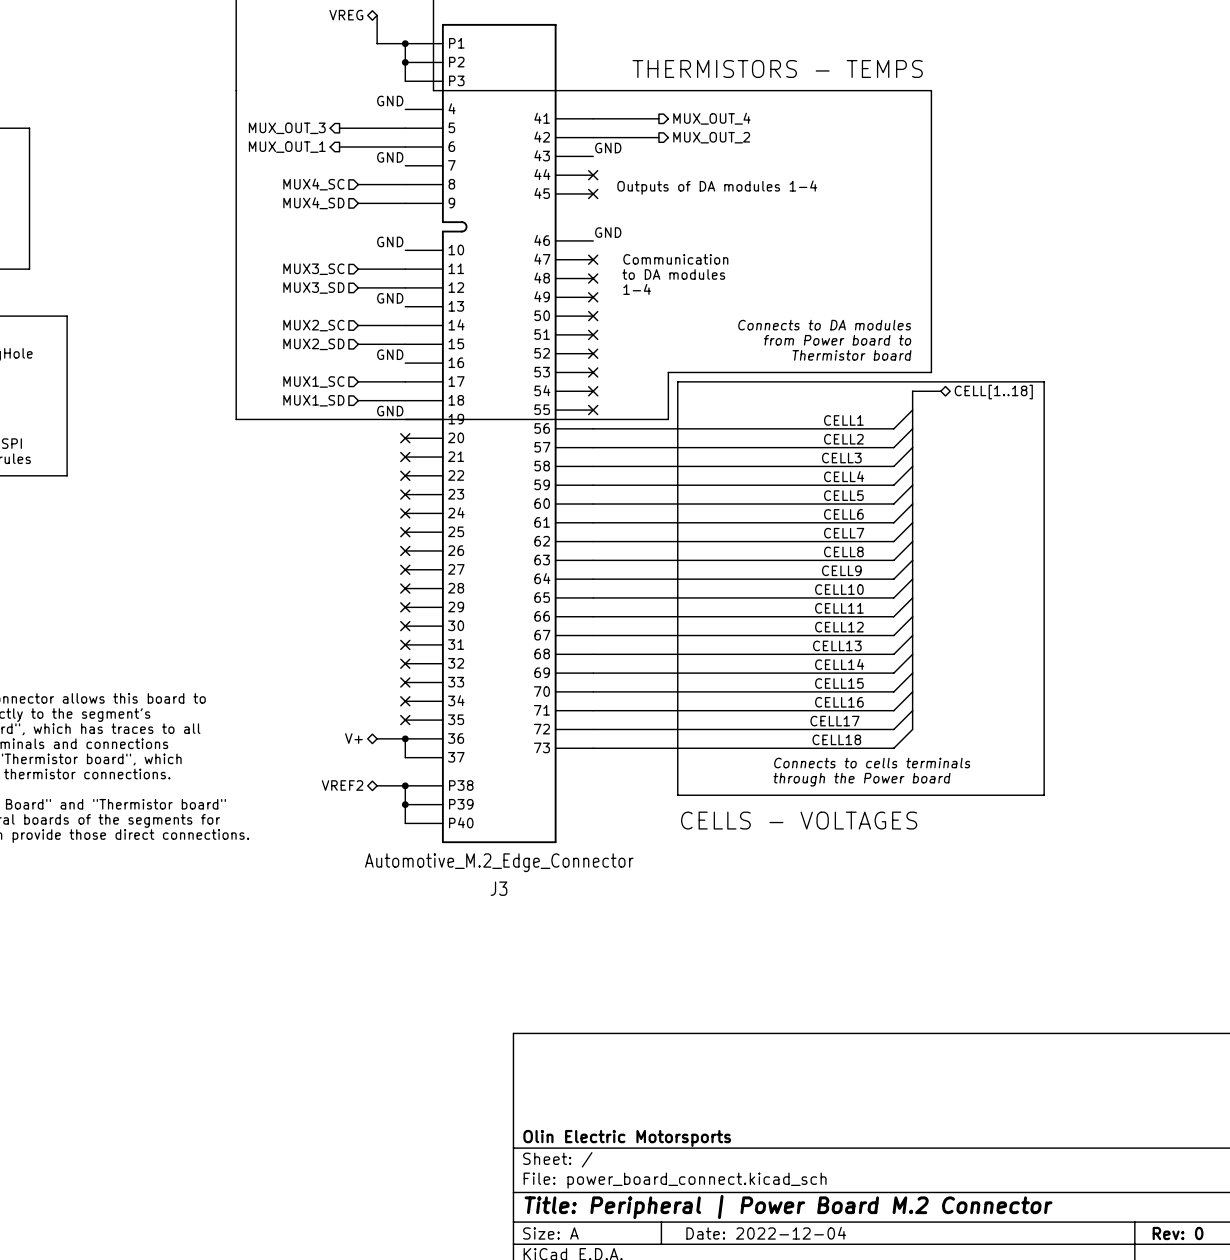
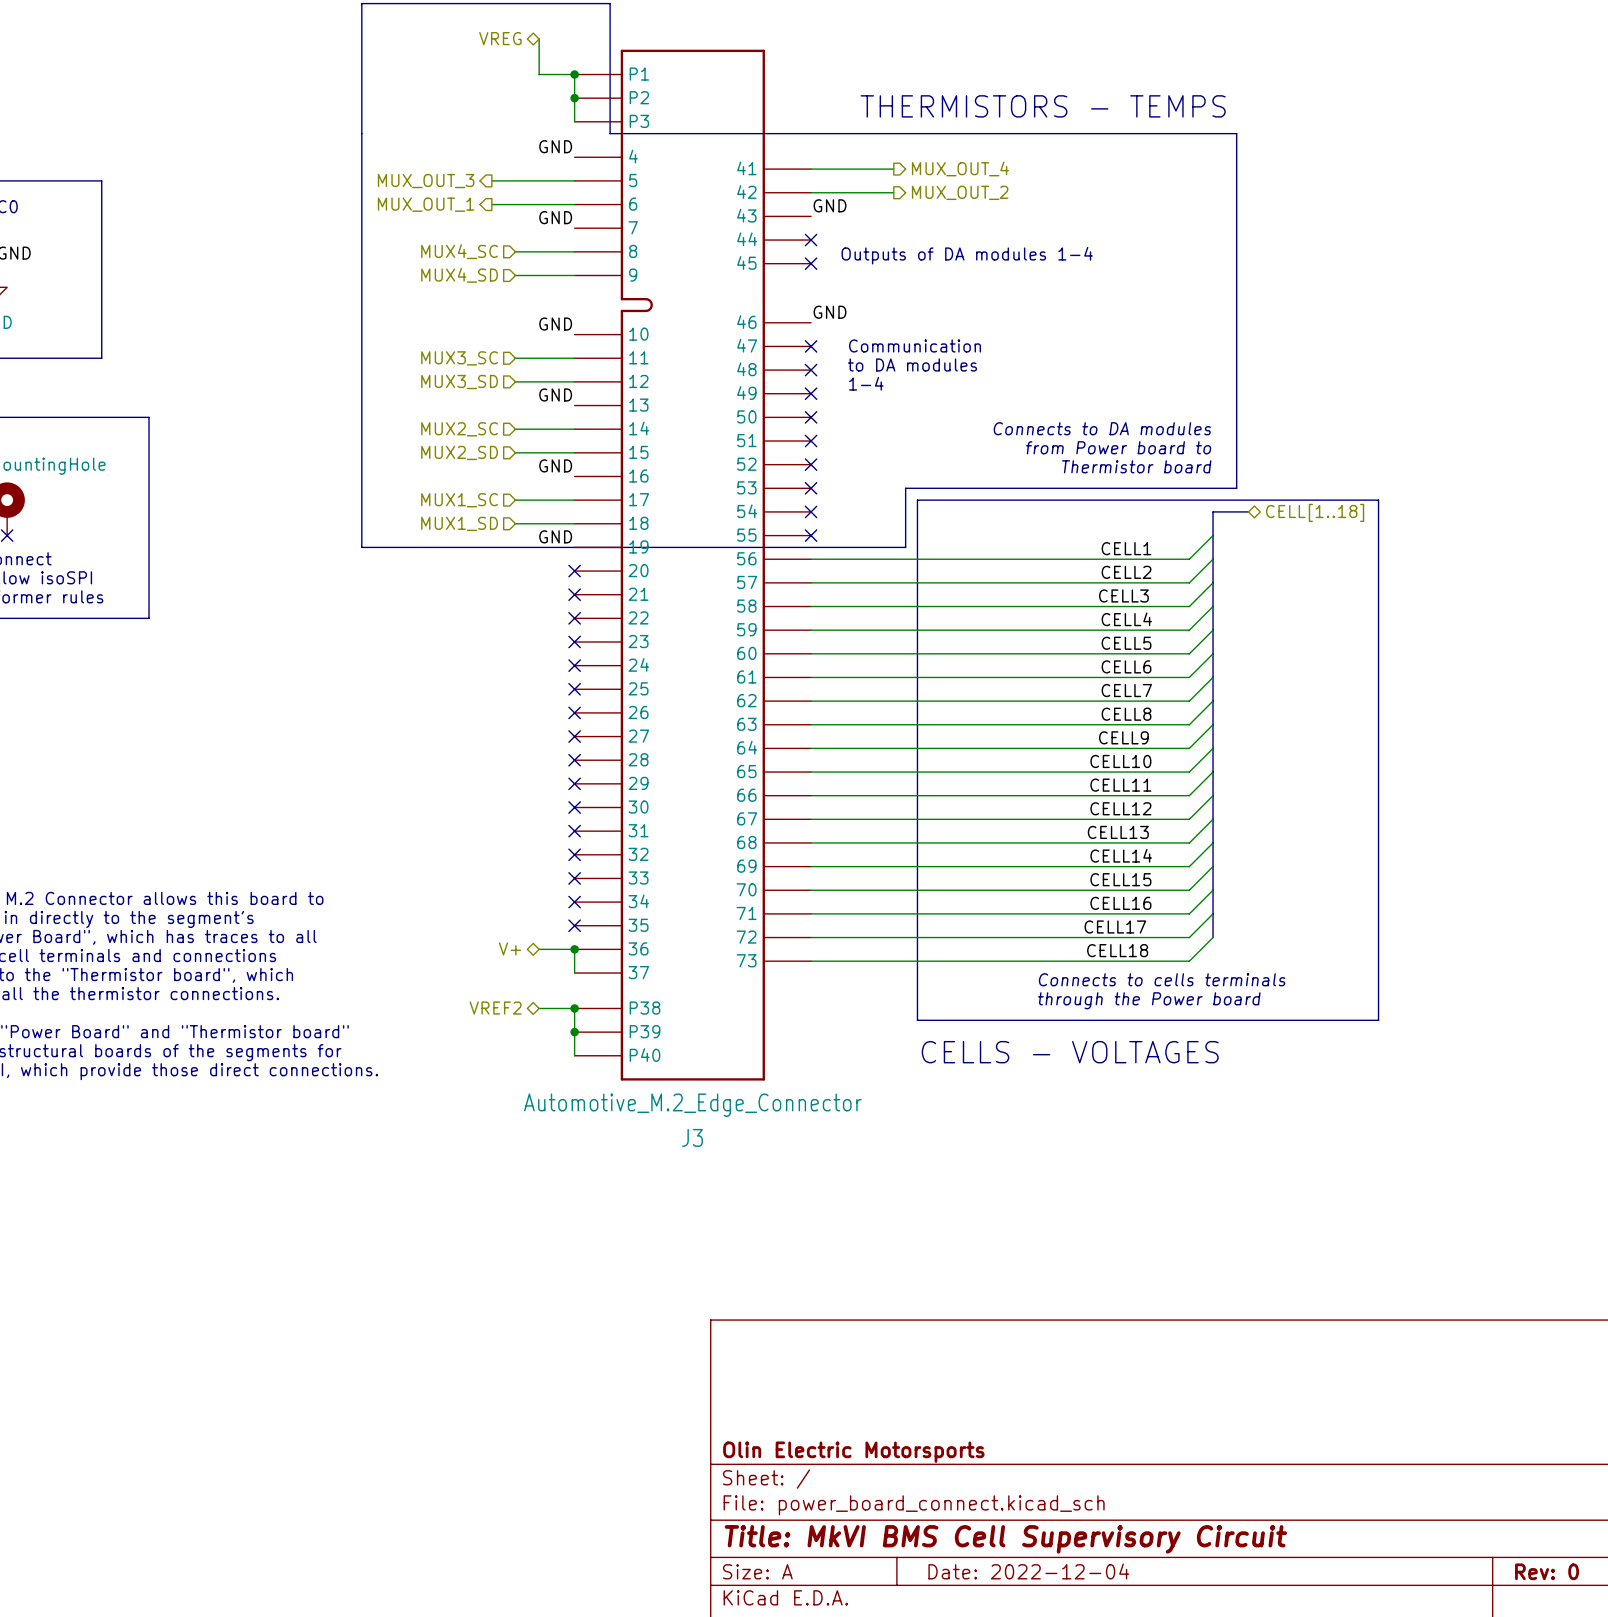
title block: Title: Peripheral | Power Board M.2 Connector (788, 1207) -> Title: MkVI BMS Cell Supervisory Circuit (1005, 1539)

